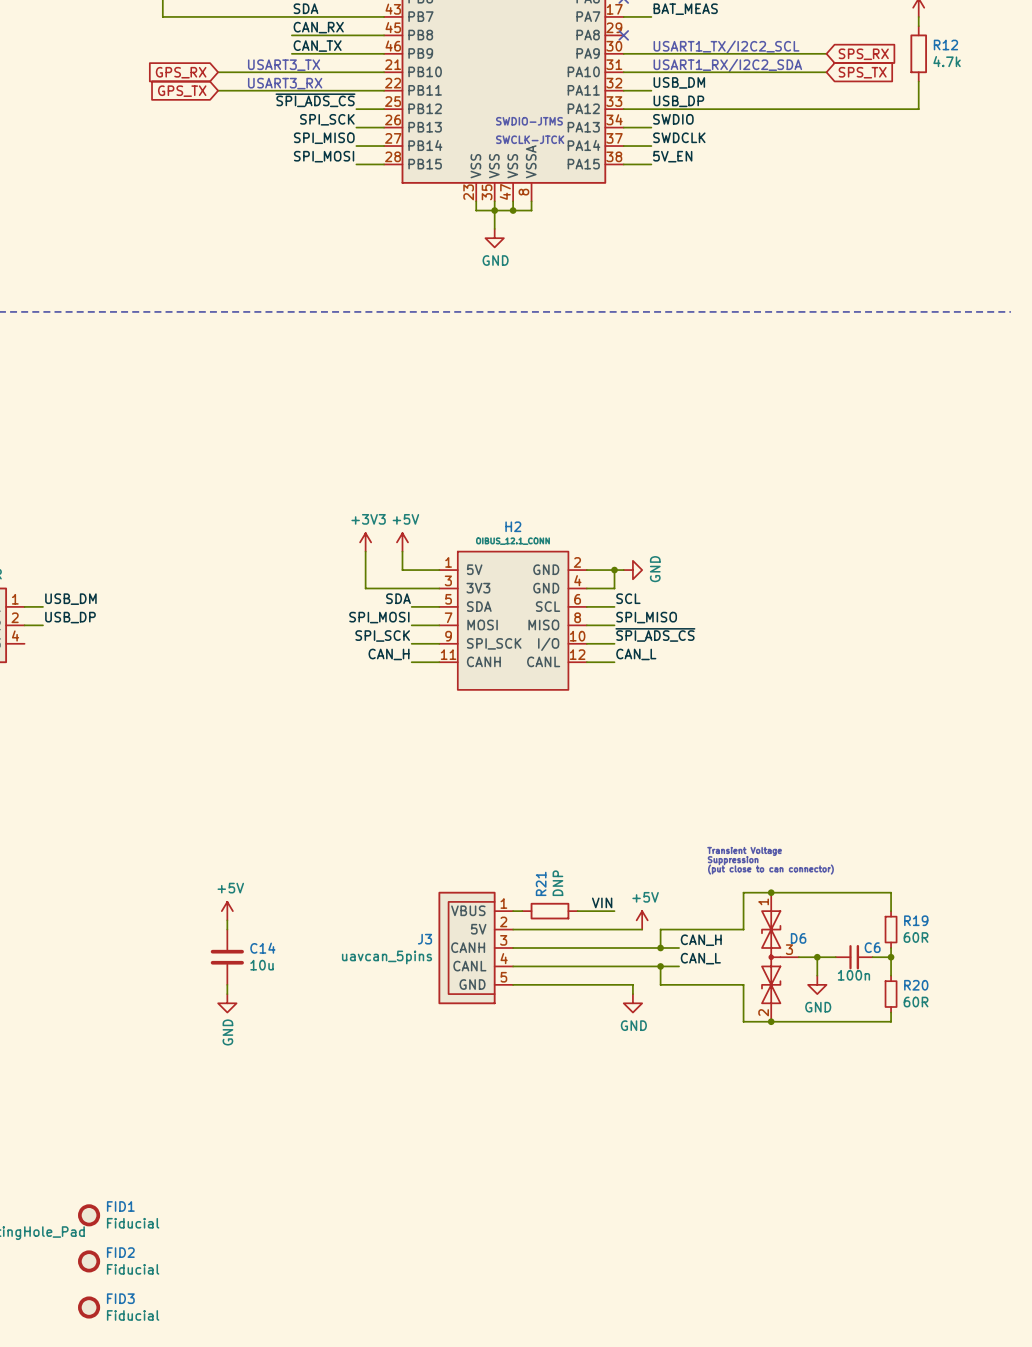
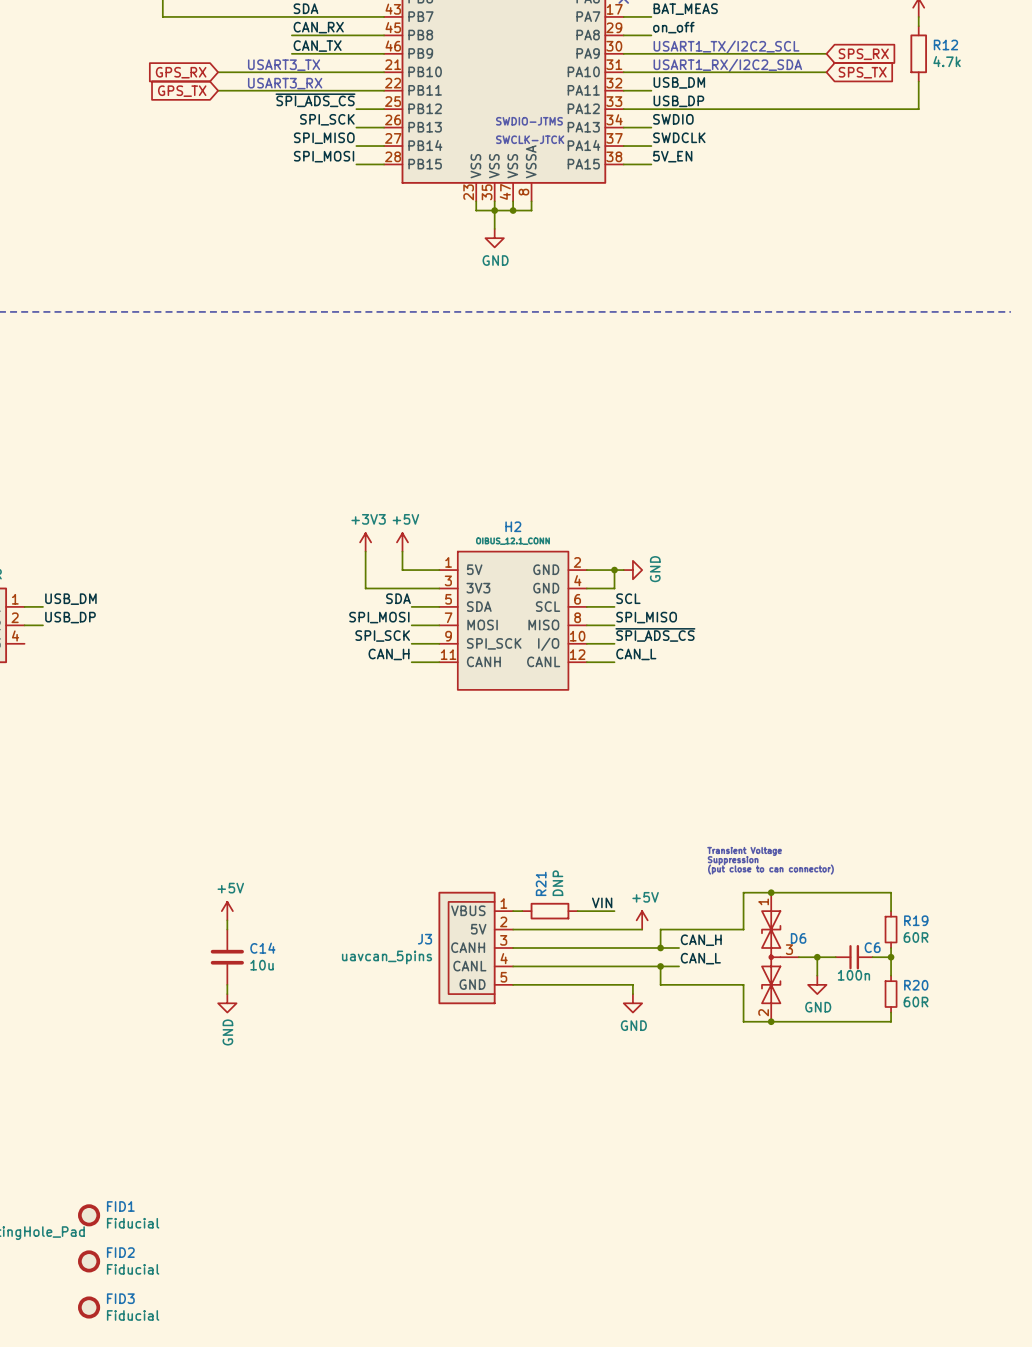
label: none -> on_off (673, 27)
wire: none -> (623, 35) (651, 35)
no-connect mark: (623, 35) -> none

